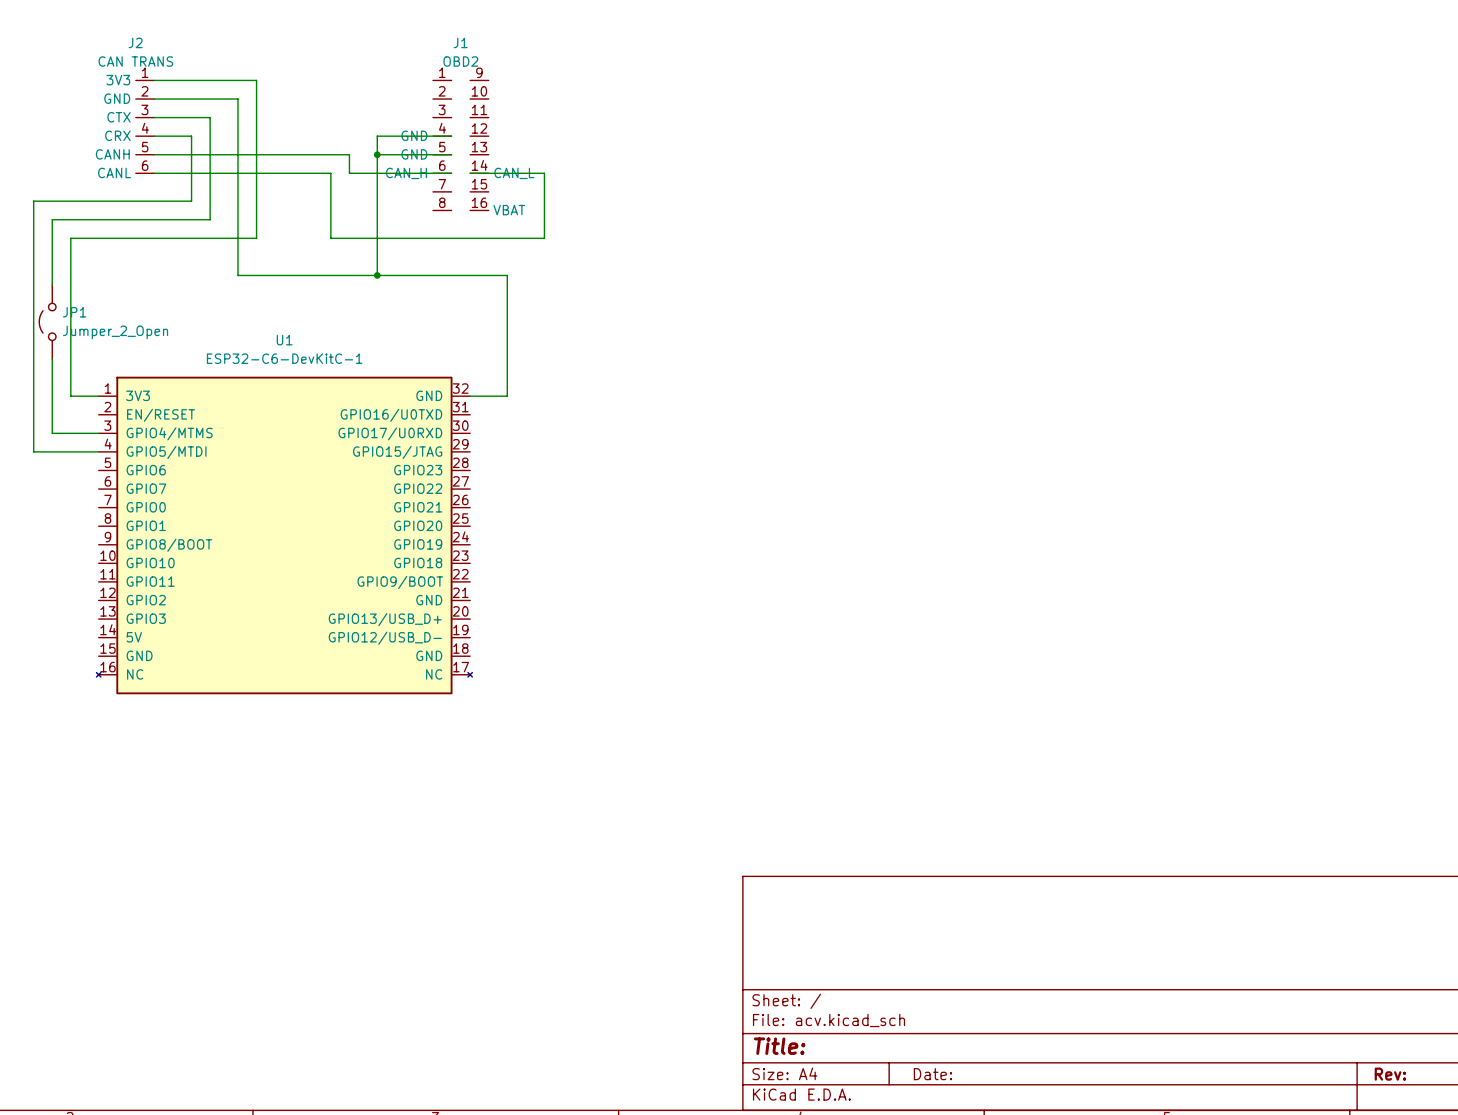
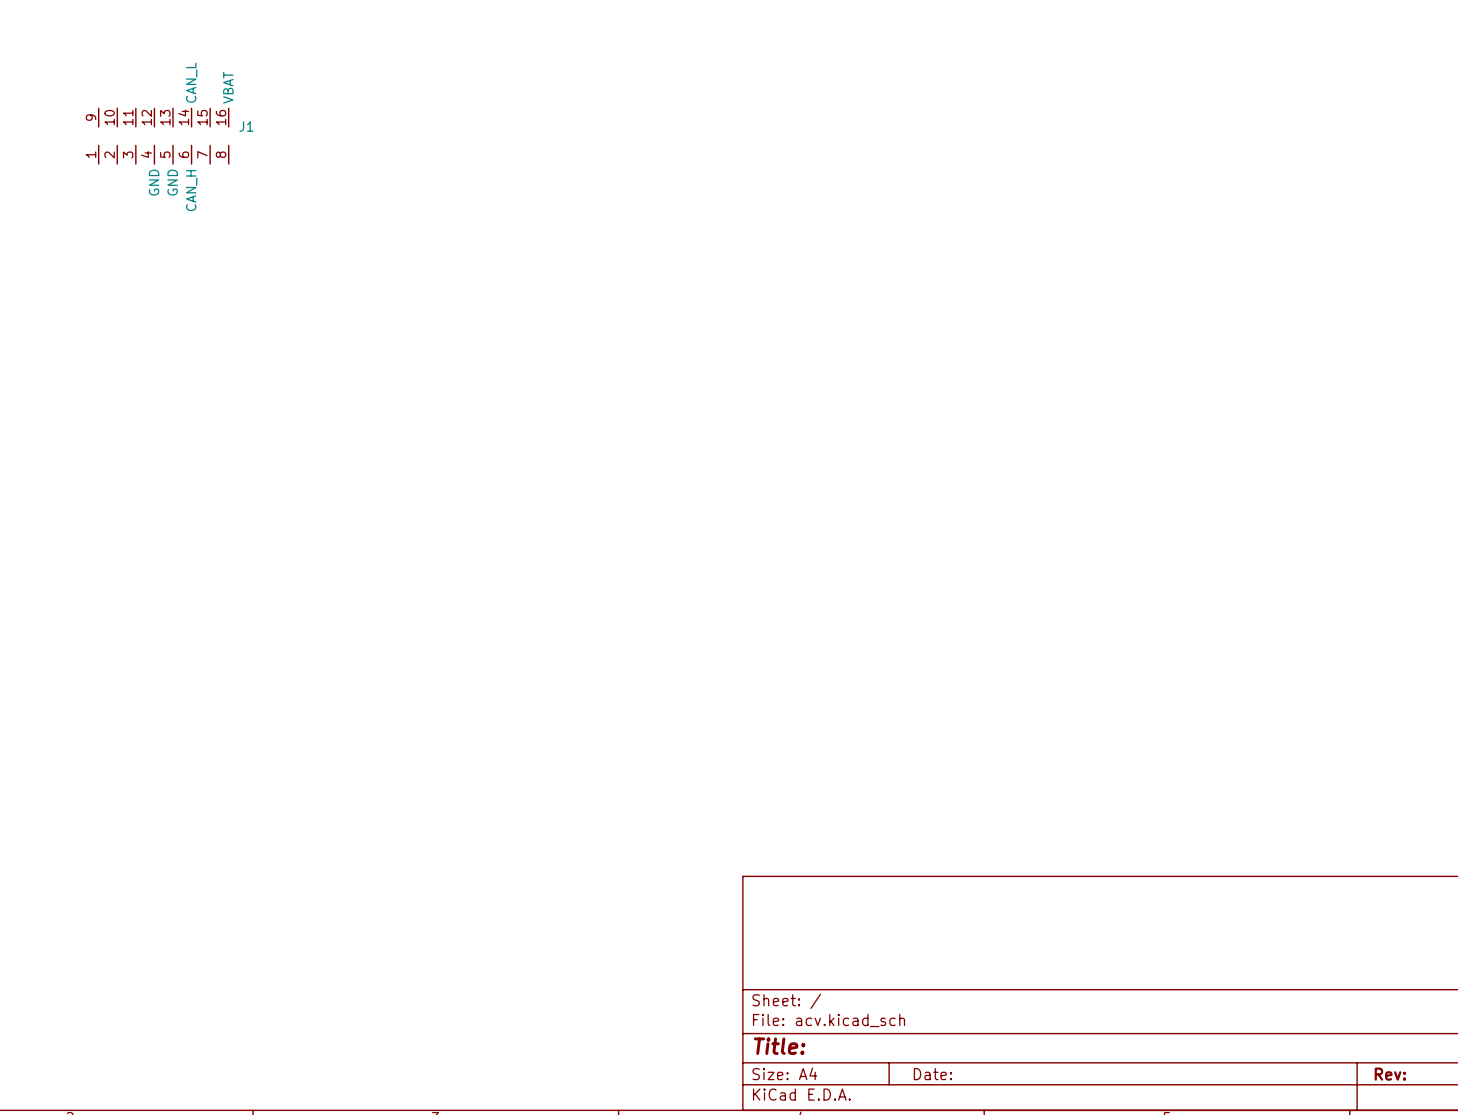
J1 name position: J1 (460, 42) -> J1 (246, 126)
J1 value: OBD2 (460, 61) -> none
wire: (154, 80) (256, 80) (256, 238) (70, 238) (70, 396) (98, 396) -> none
wire: (154, 99) (237, 99) (237, 275) (507, 275) (507, 396) (470, 396) -> none
wire: (154, 117) (210, 117) (210, 219) (52, 219) (52, 284) -> none
J2: CAN TRANS (145, 126) -> none
wire: (154, 136) (191, 136) (191, 201) (33, 201) (33, 451) (98, 451) -> none
wire: (451, 136) (377, 136) (377, 275) -> none
J1 rotation: 0° (460, 145) -> 90° counterclockwise (163, 136)
J1 position: (460, 145) -> (163, 136)
wire: (154, 154) (349, 154) (349, 173) (451, 173) -> none
wire: (377, 154) (451, 154) -> none
junction: (377, 154) -> none
wire: (154, 173) (330, 173) (330, 238) (544, 238) (544, 173) (470, 173) -> none
junction: (377, 275) -> none
JP1: Jumper_2_Open (47, 321) -> none
wire: (52, 359) (52, 433) (98, 433) -> none
U1: ESP32-C6-DevKitC-1 (284, 535) -> none

